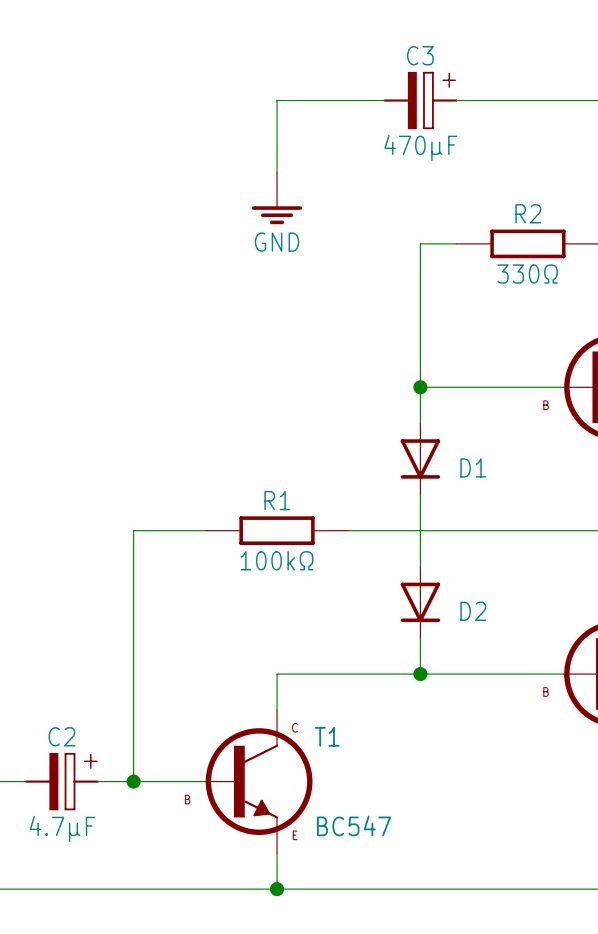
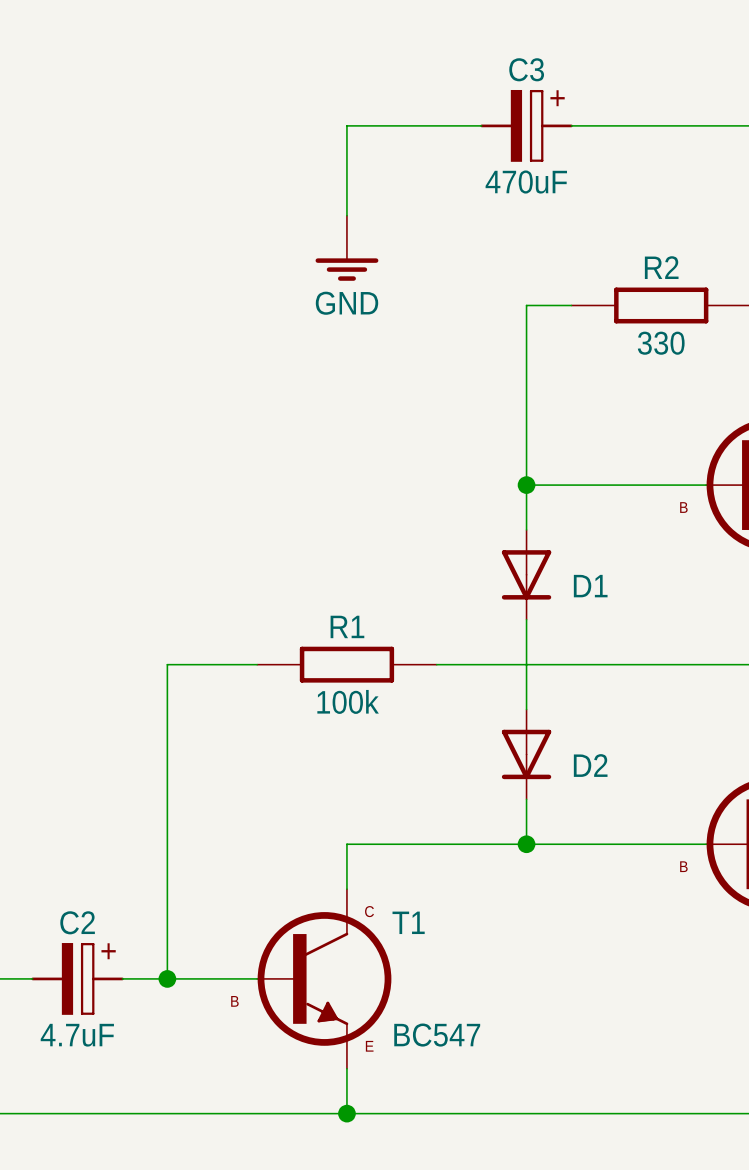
C3 value: 470μF (420, 147) -> 470uF (526, 182)
R2 value: 330Ω (527, 274) -> 330 (661, 343)
R1 value: 100kΩ (277, 560) -> 100k (348, 701)
C2 value: 4.7μF (62, 828) -> 4.7uF (77, 1035)

